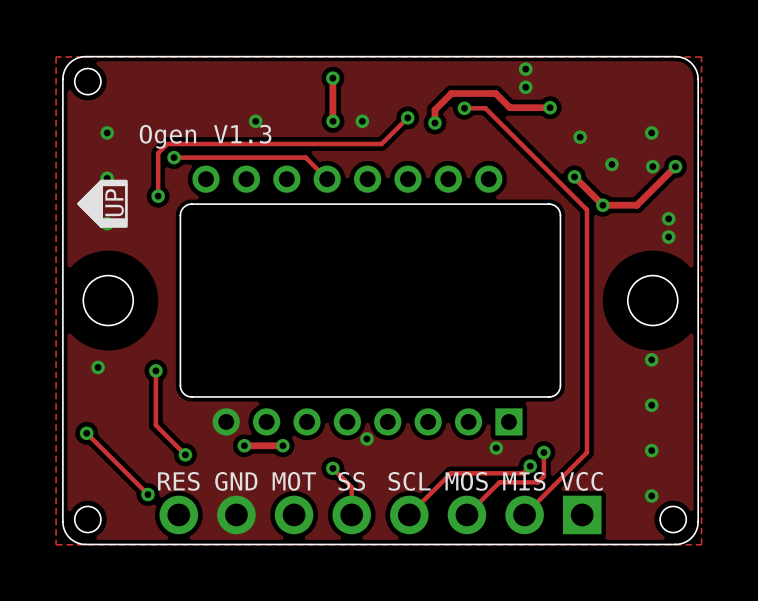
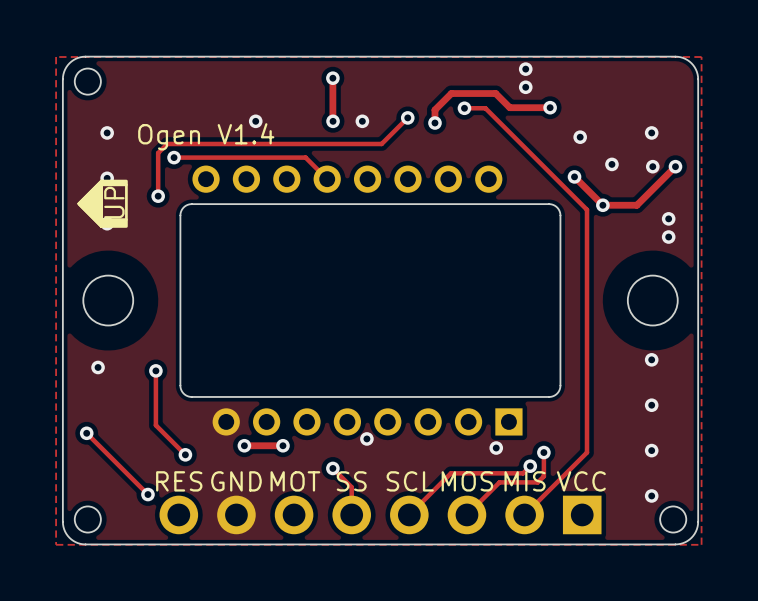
text: Ogen V1.3 (205, 136) -> Ogen V1.4 (206, 136)

